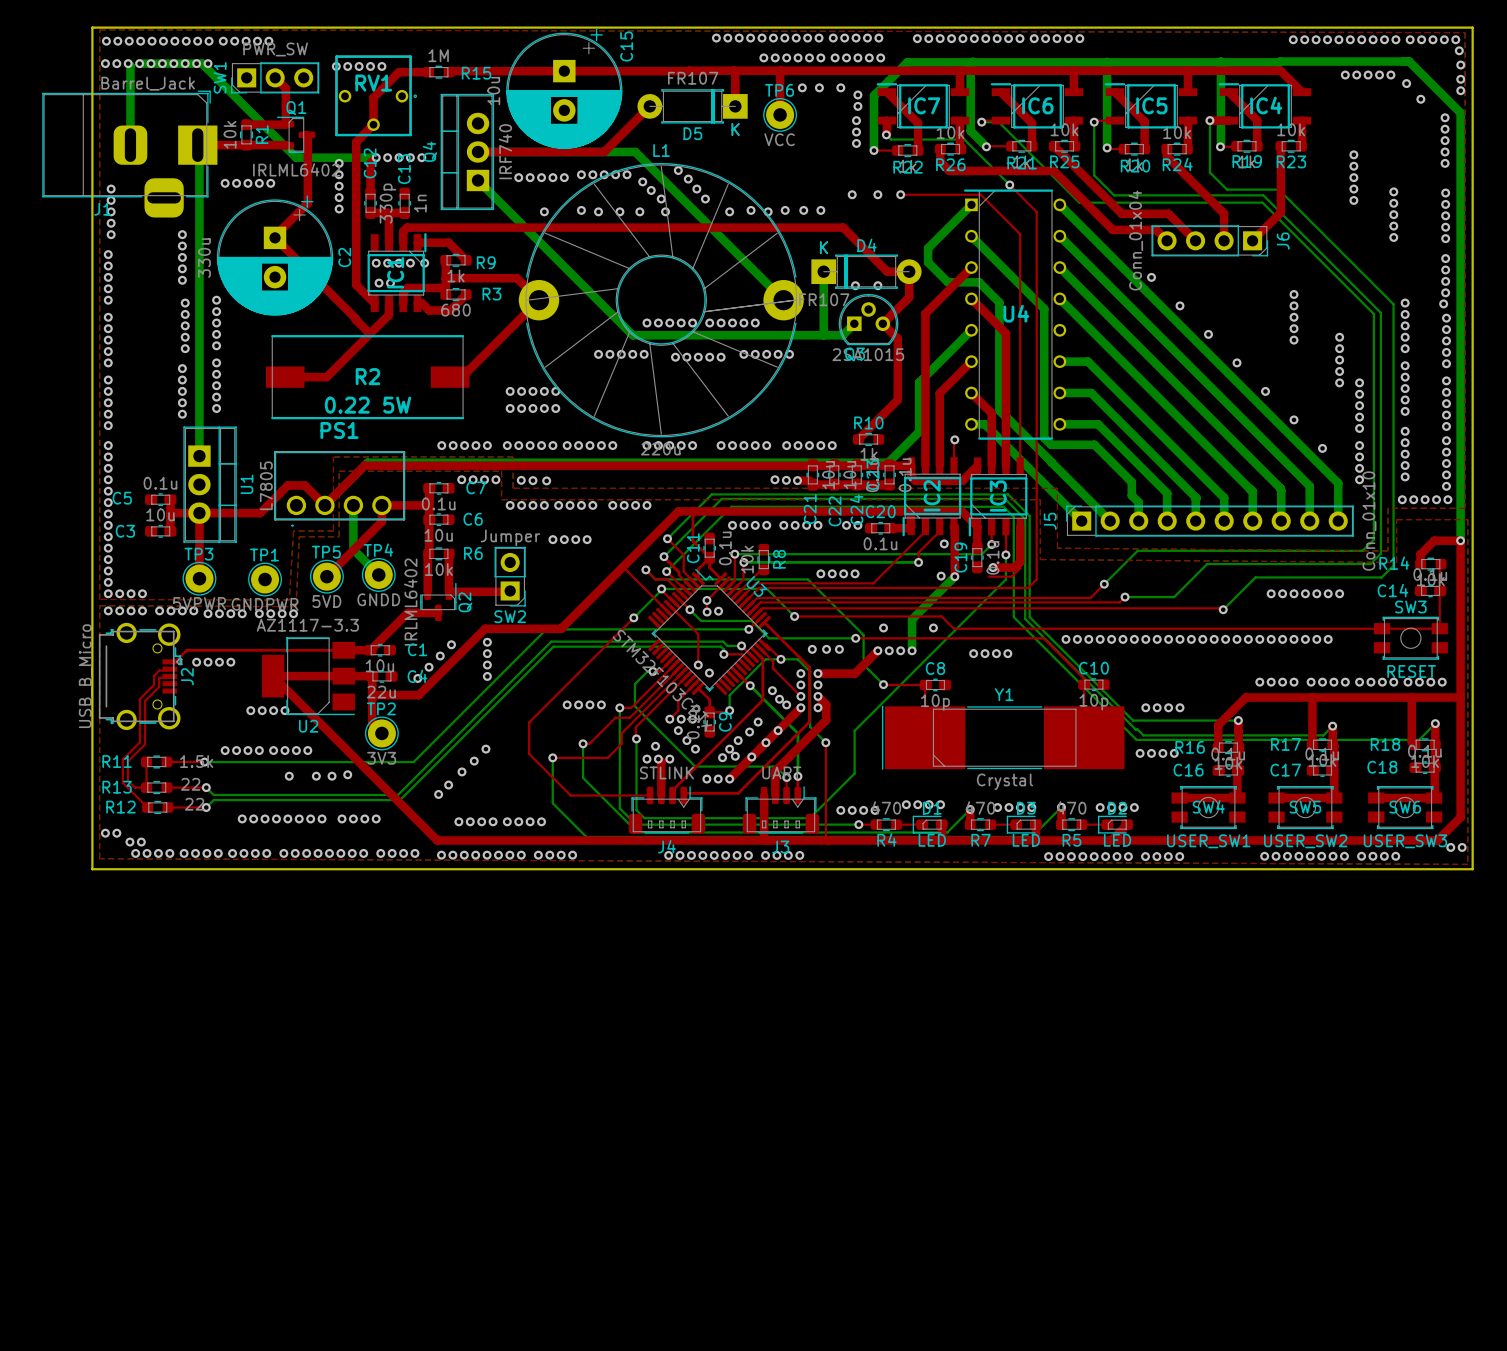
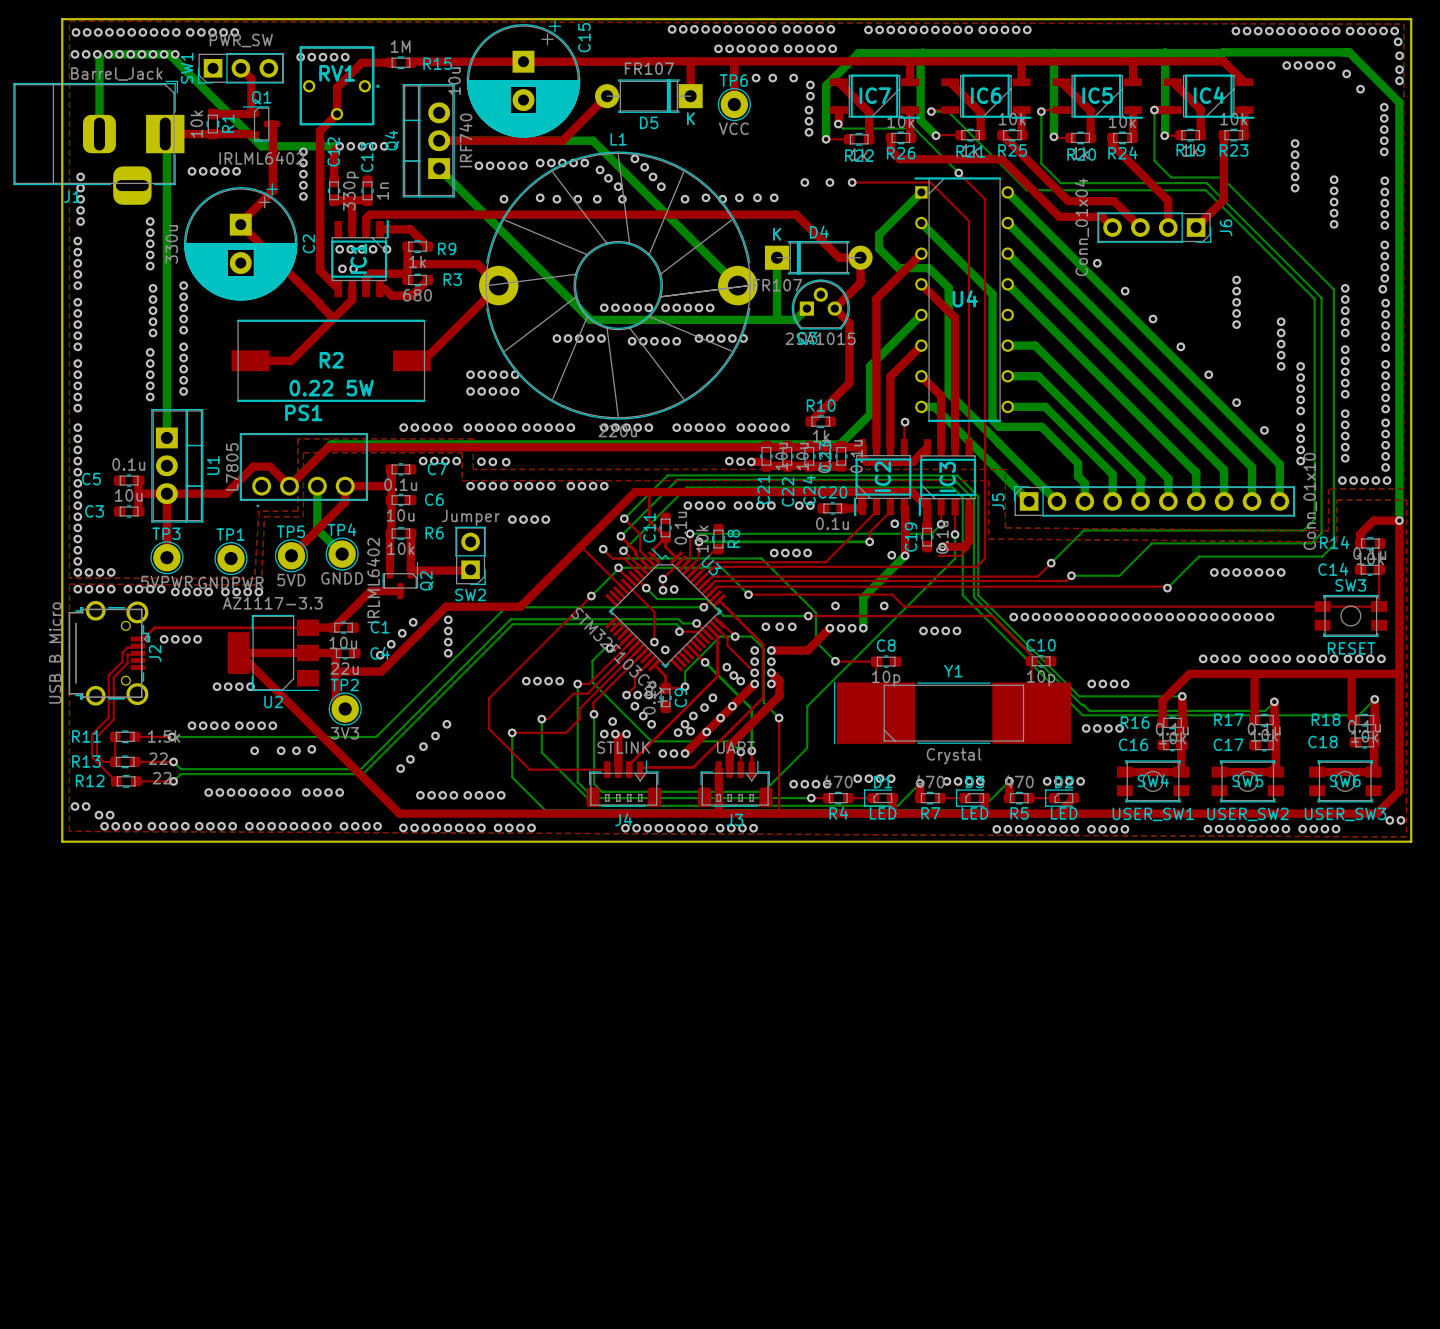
IC7 rotation: 0° (922, 105) -> 180° (875, 96)
IC6 rotation: 0° (1036, 105) -> 180° (986, 96)
IC5 rotation: 0° (1150, 105) -> 180° (1097, 96)
IC4 rotation: 0° (1264, 105) -> 180° (1209, 96)
via: (855, 285) -> none
via: (877, 285) -> none

